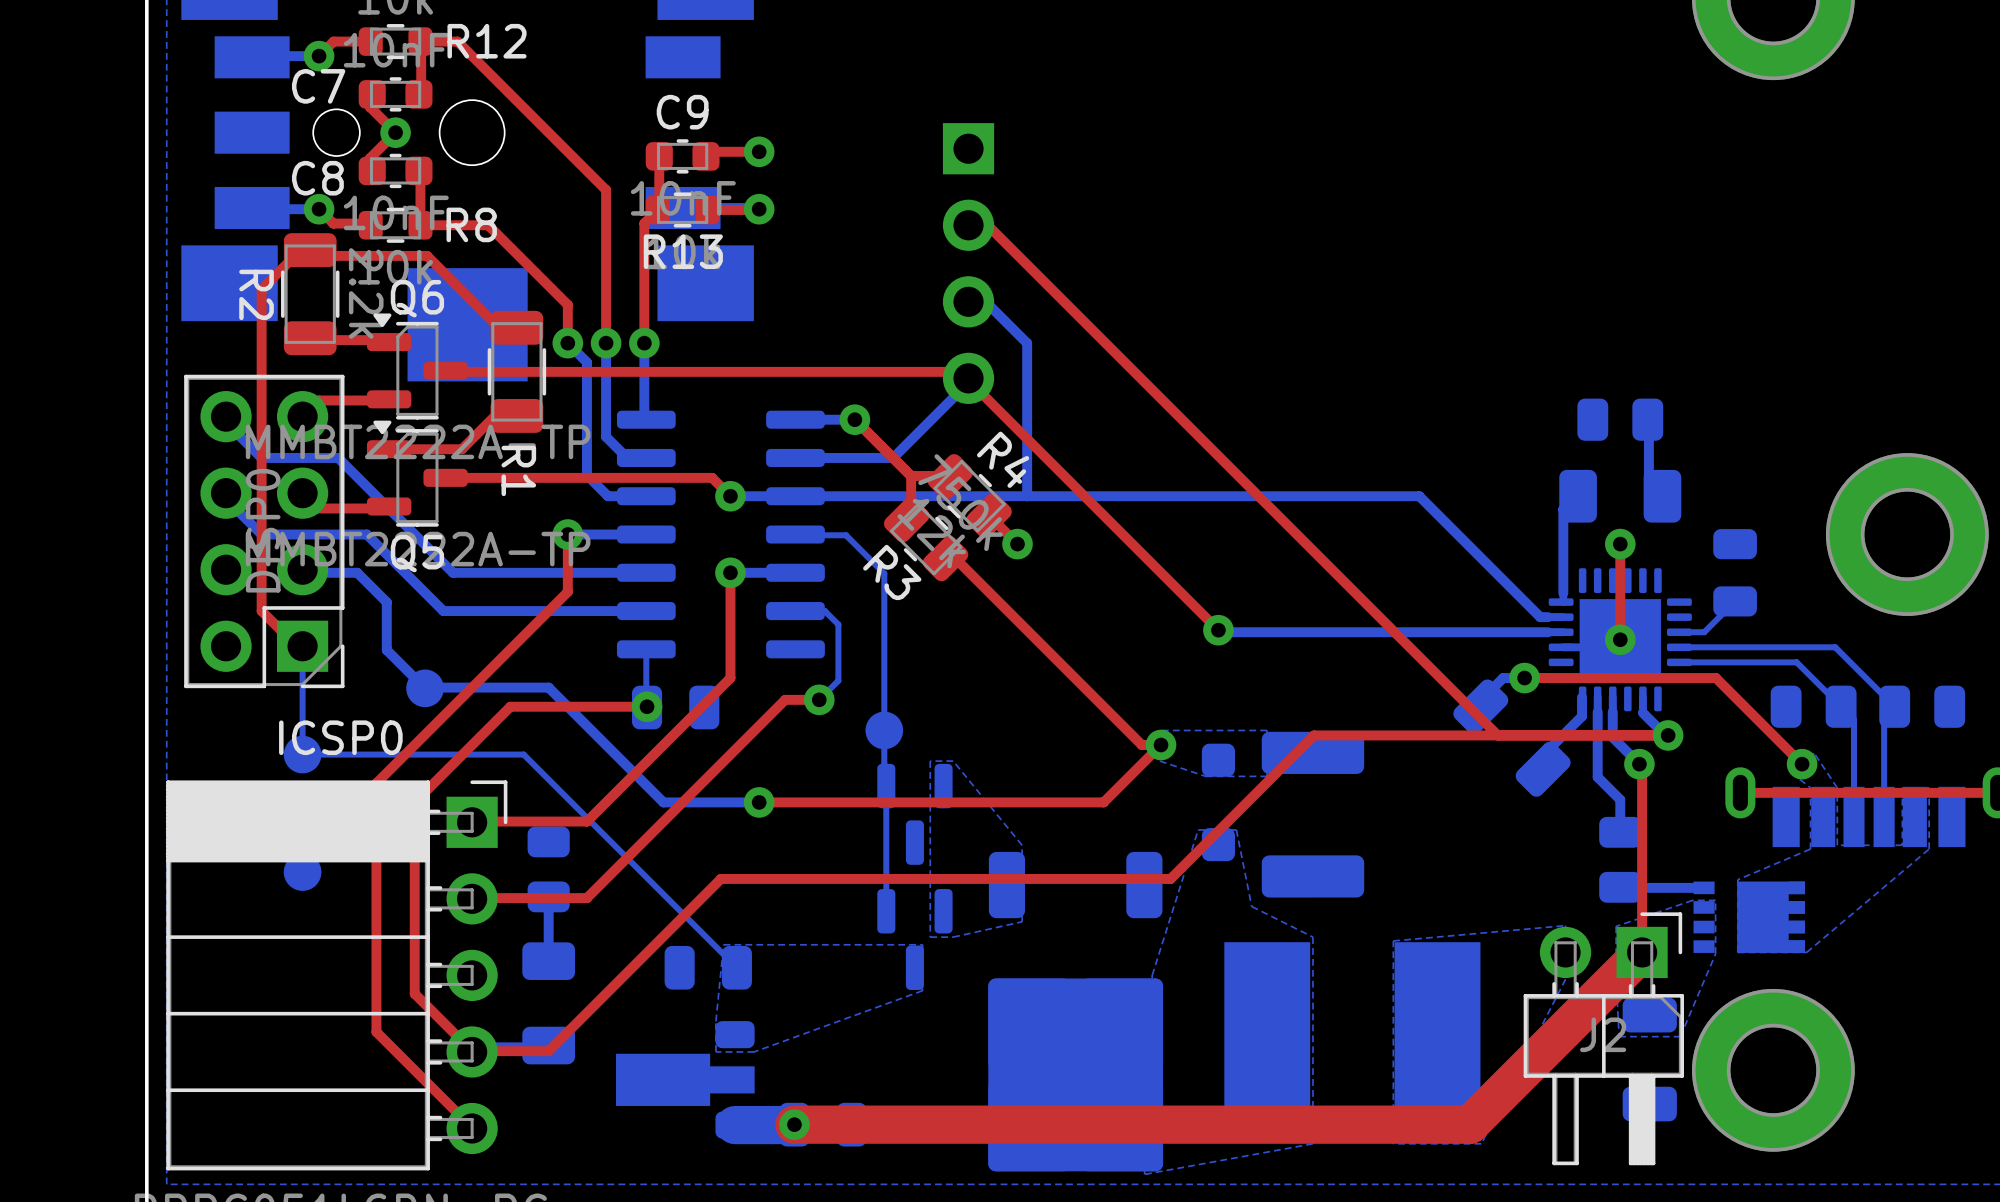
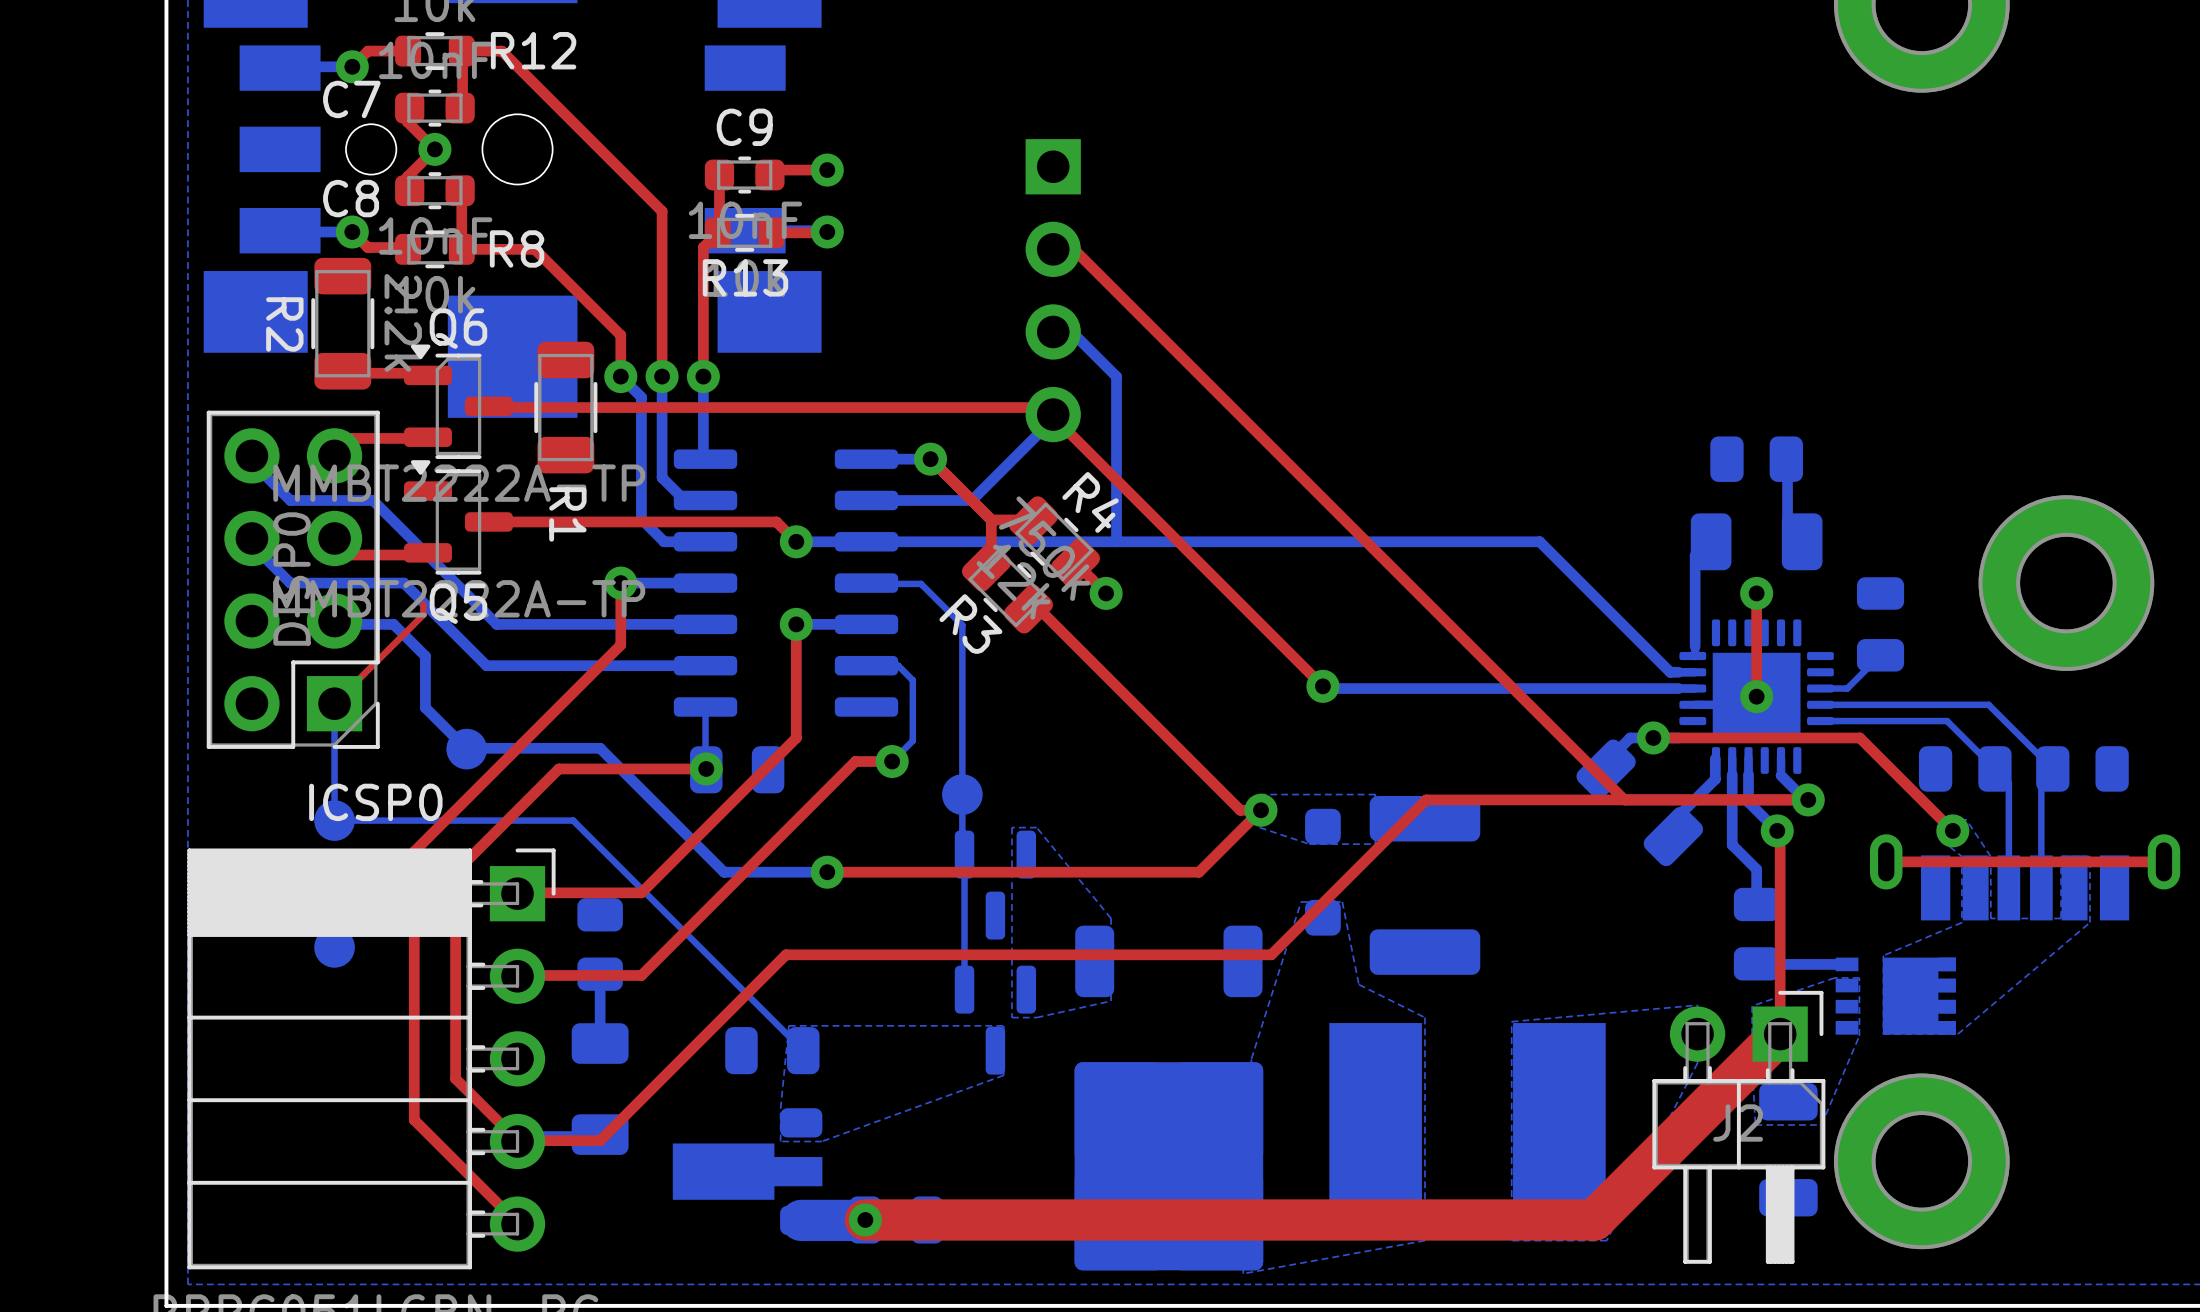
top track: (500, 329) (427, 255) (316, 255) (310, 250) (300, 250) (261, 289) (261, 611) (299, 649) -> none
top track: (500, 414) (497, 414) (461, 449) (389, 449) -> none
top track: none -> (423, 604) (423, 614) (334, 703)

